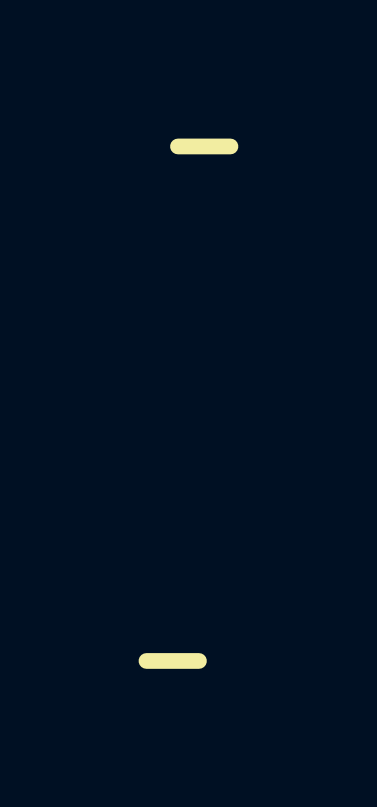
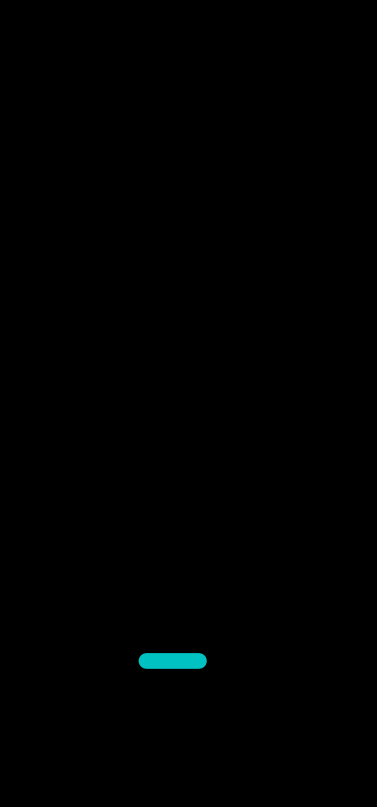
line: (230, 146) (177, 146) -> none

